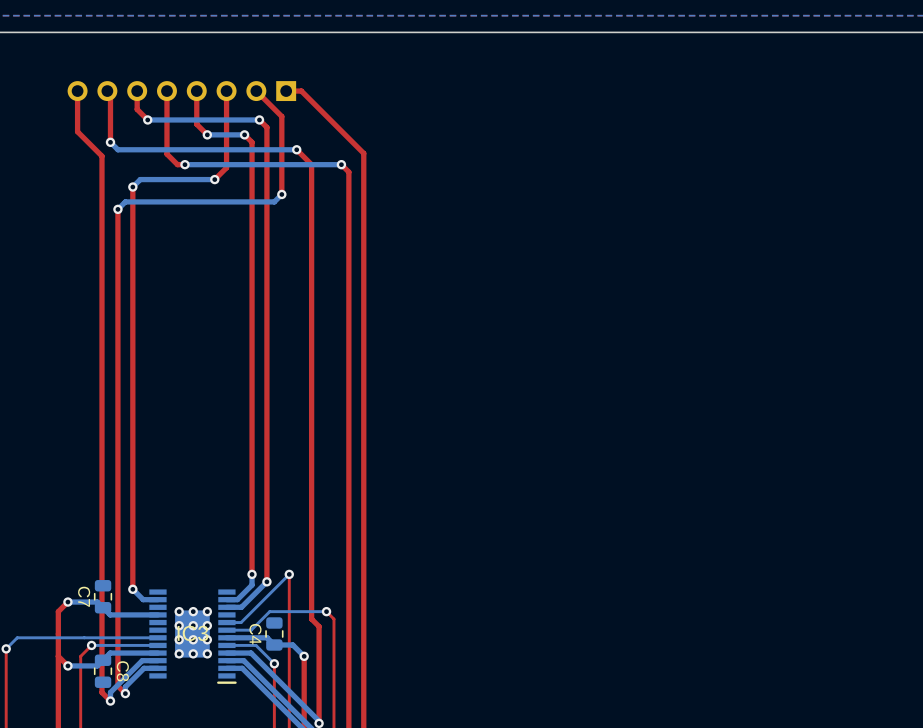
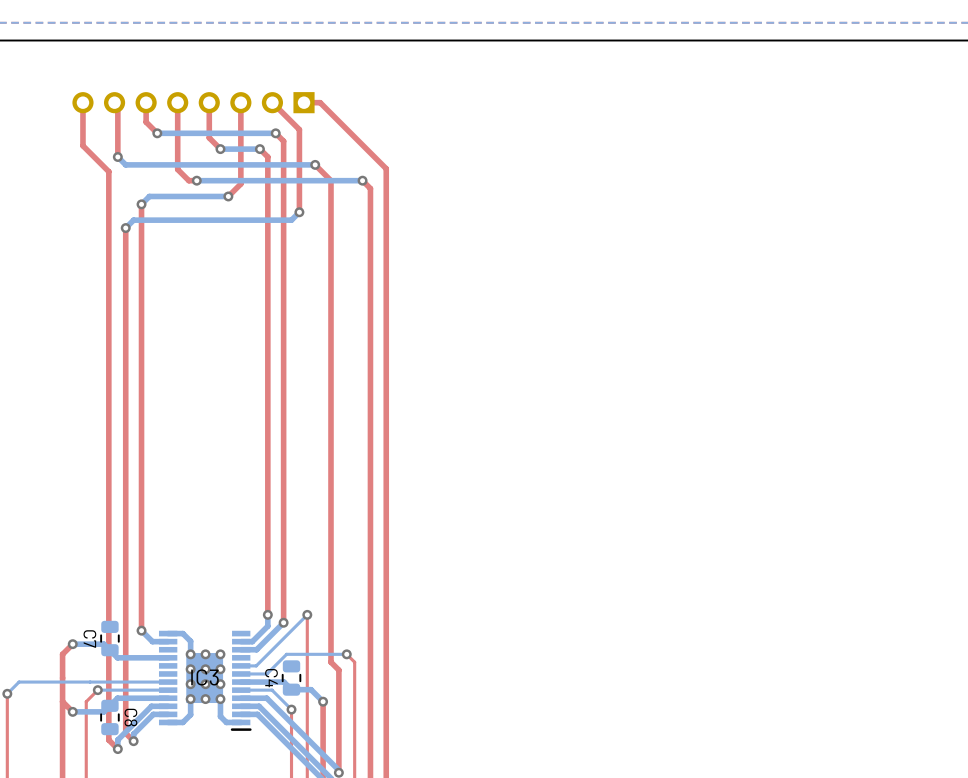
bottom track: none -> (168, 633) (182, 633) (190, 641) (190, 654)
bottom track: none -> (190, 699) (190, 714) (182, 722) (168, 722)
bottom track: none -> (220, 699) (220, 716) (226, 722) (241, 722)

